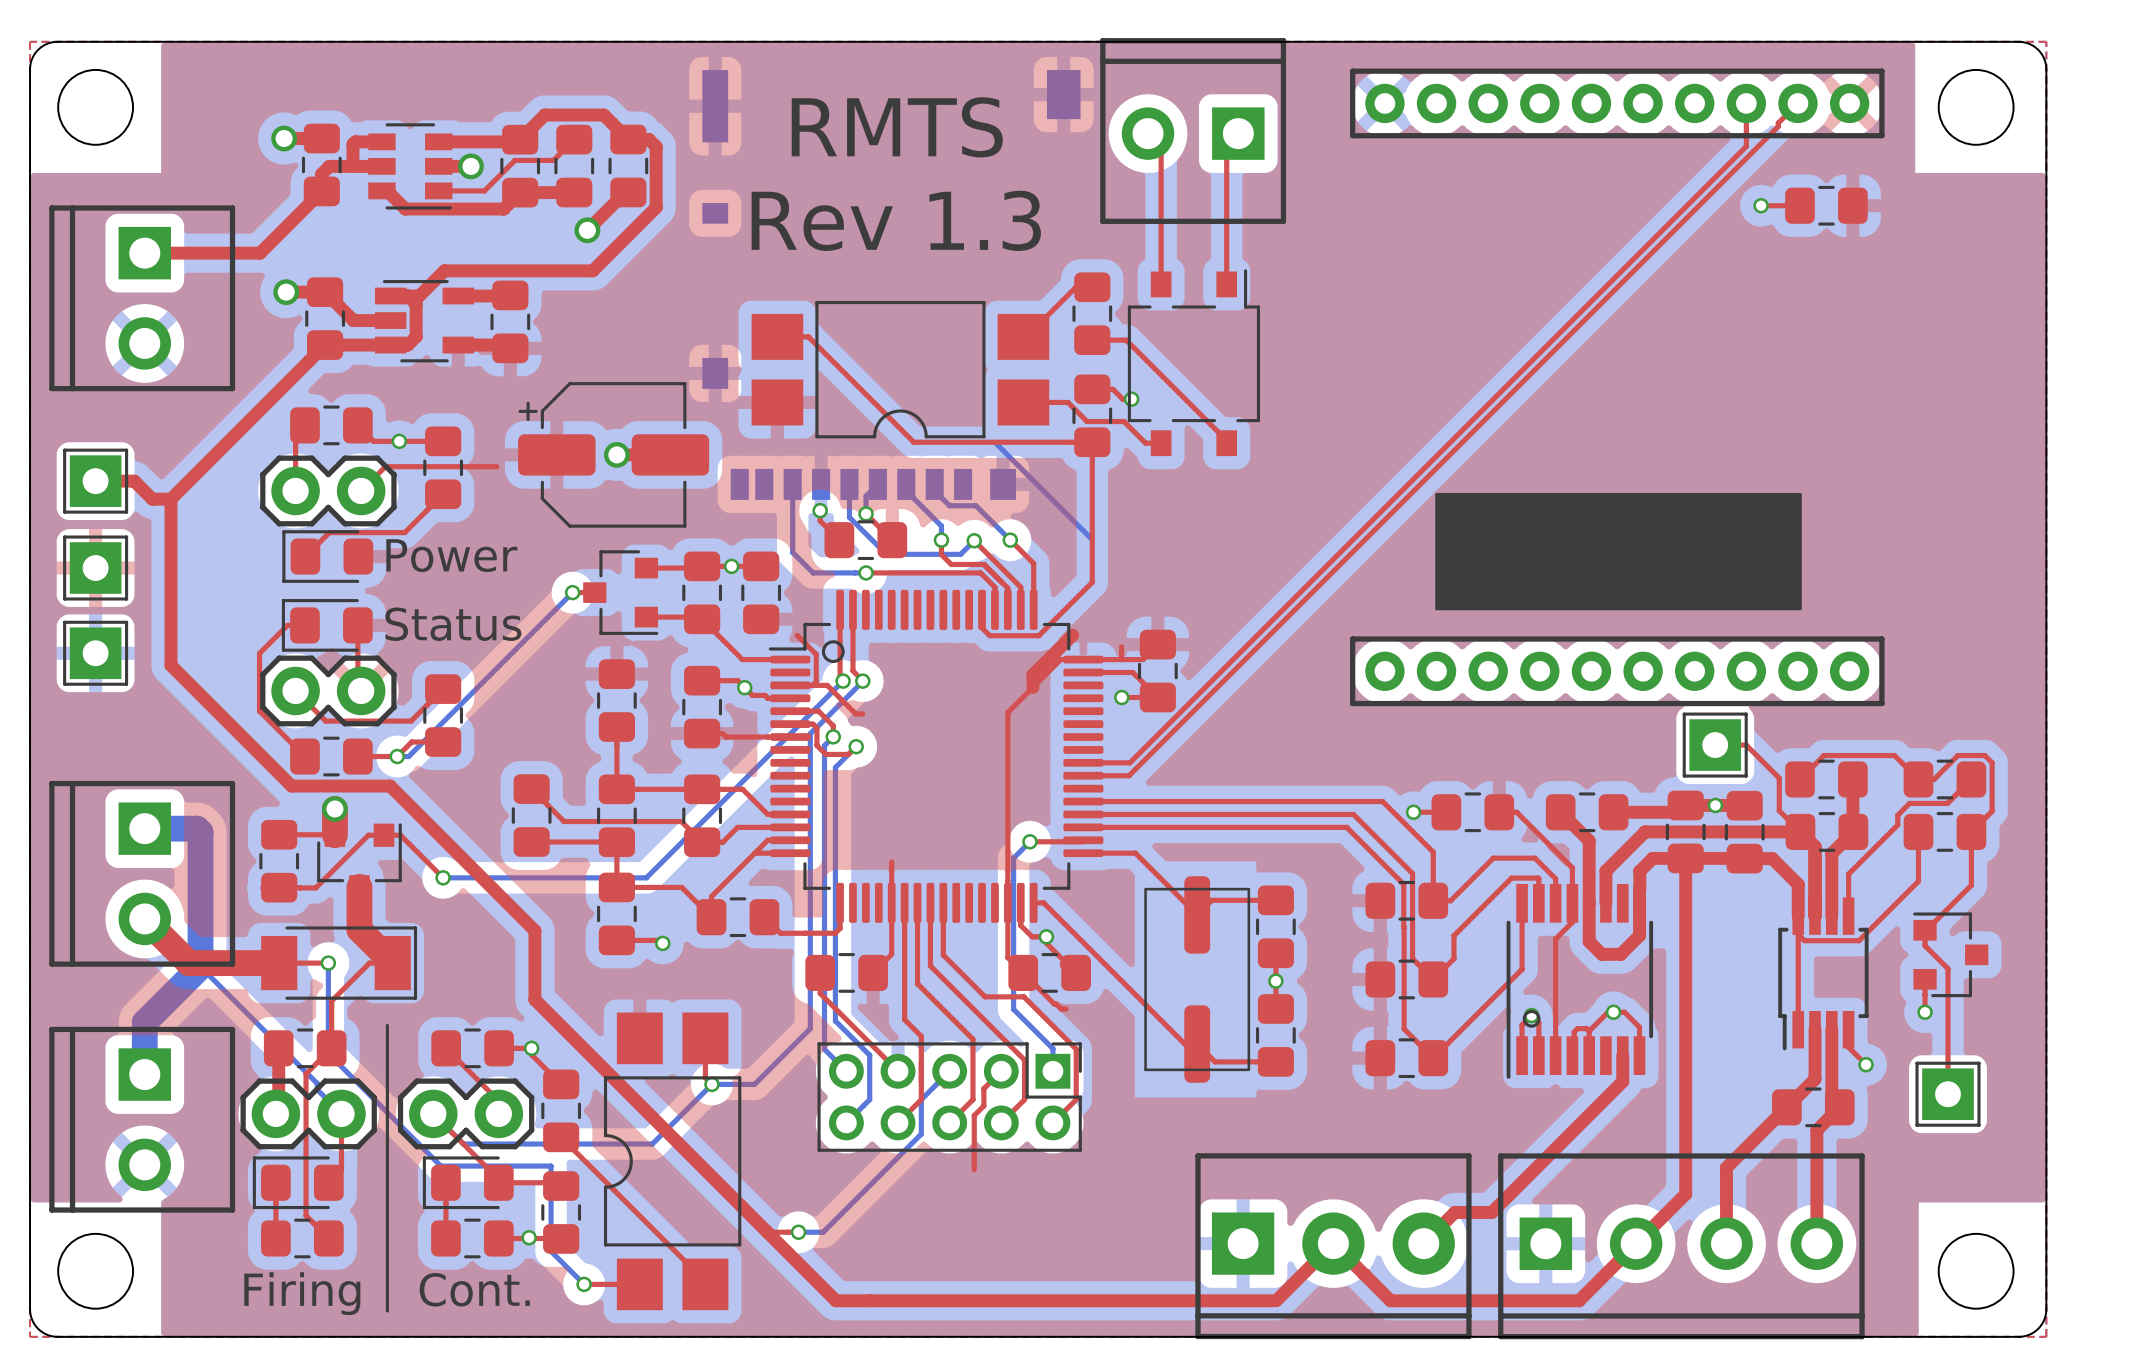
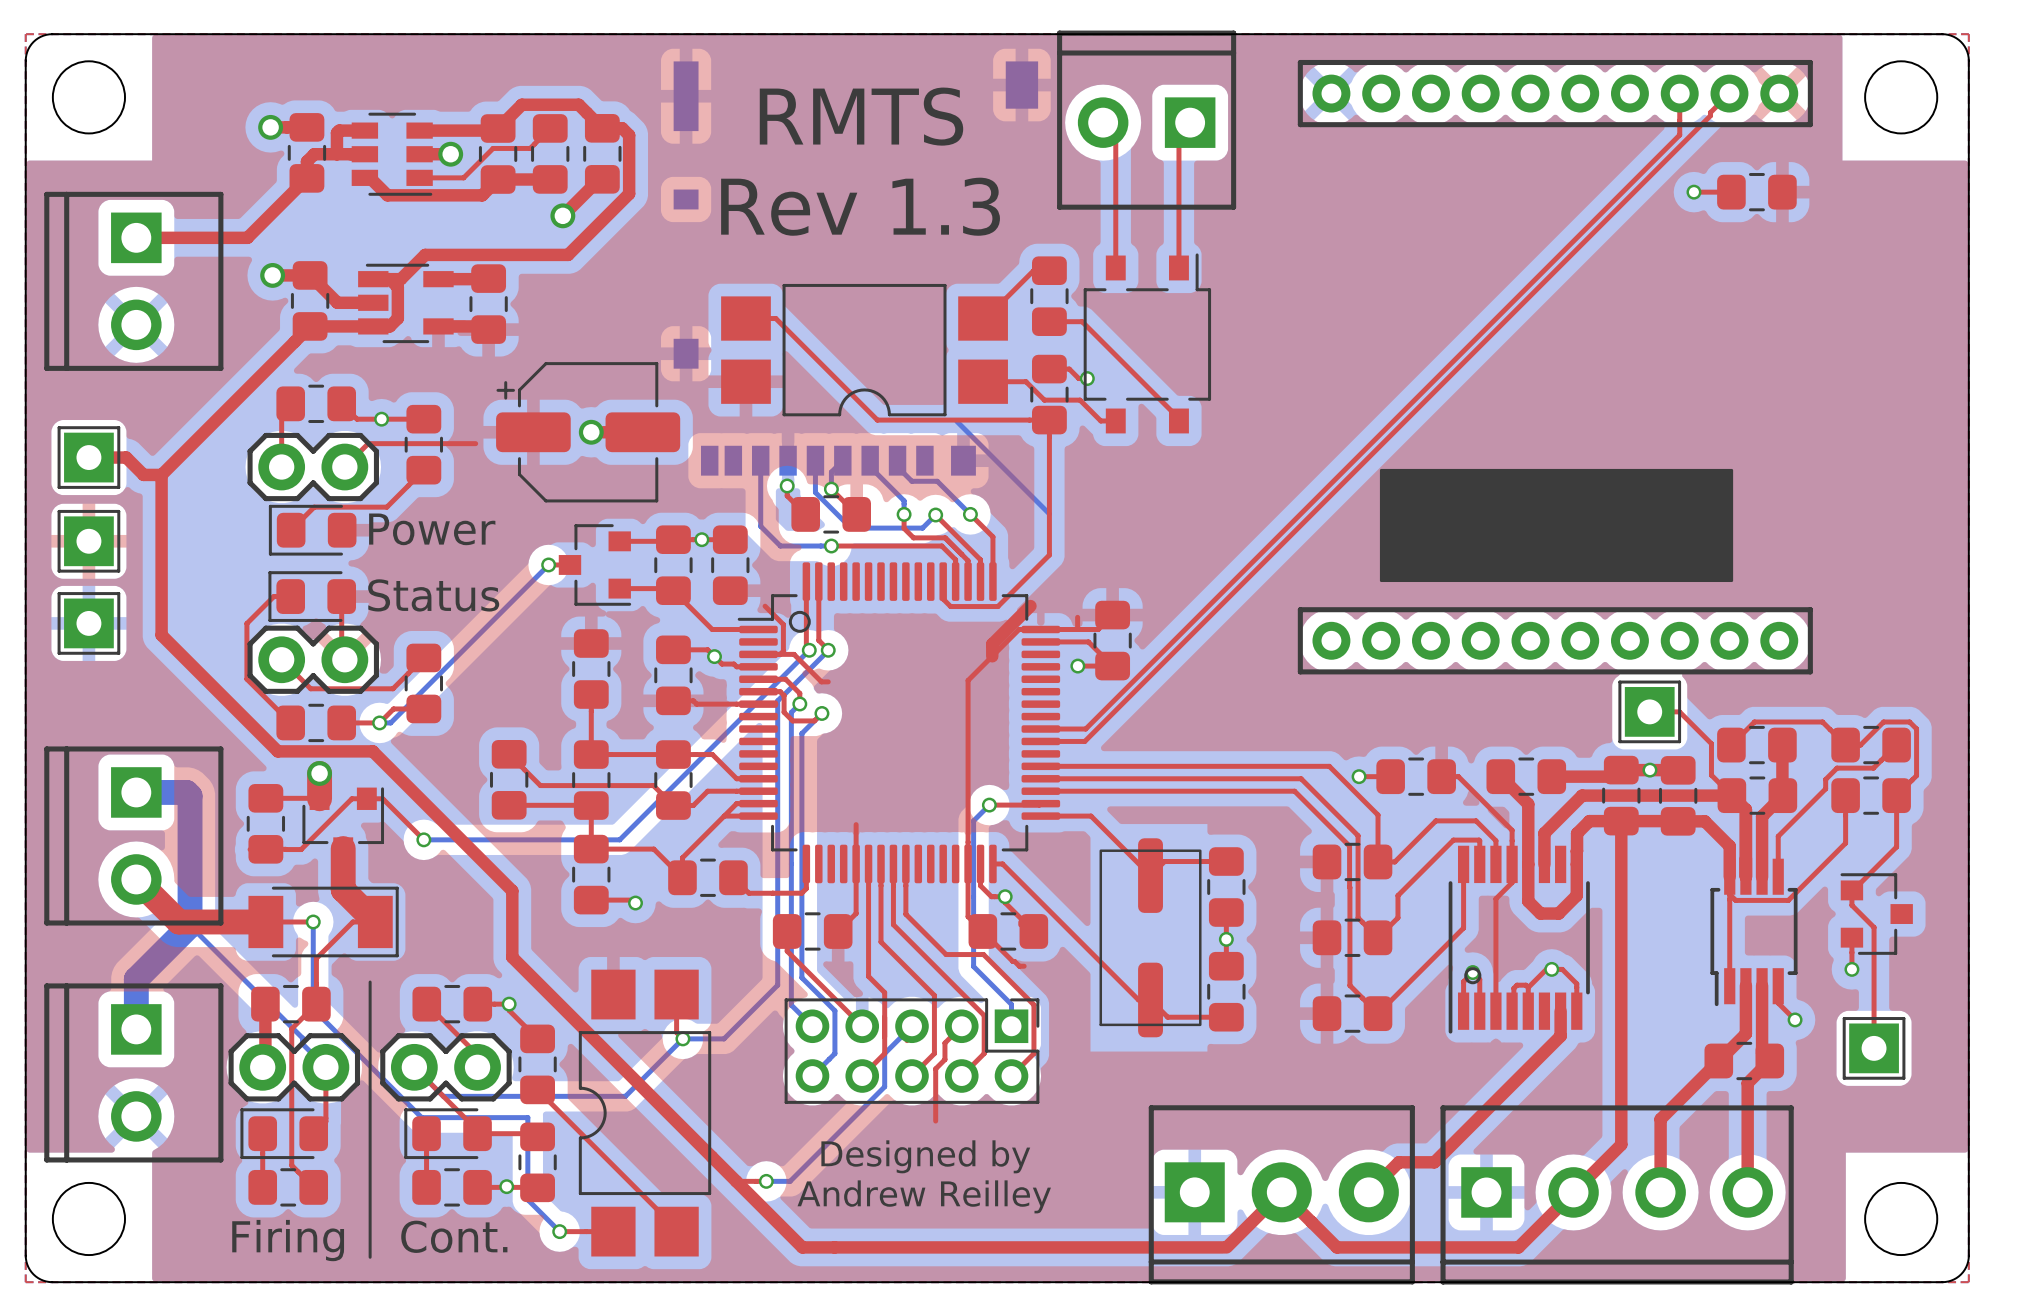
text: none -> Designed by (925, 1156)
text: none -> Andrew Reilley (924, 1196)

